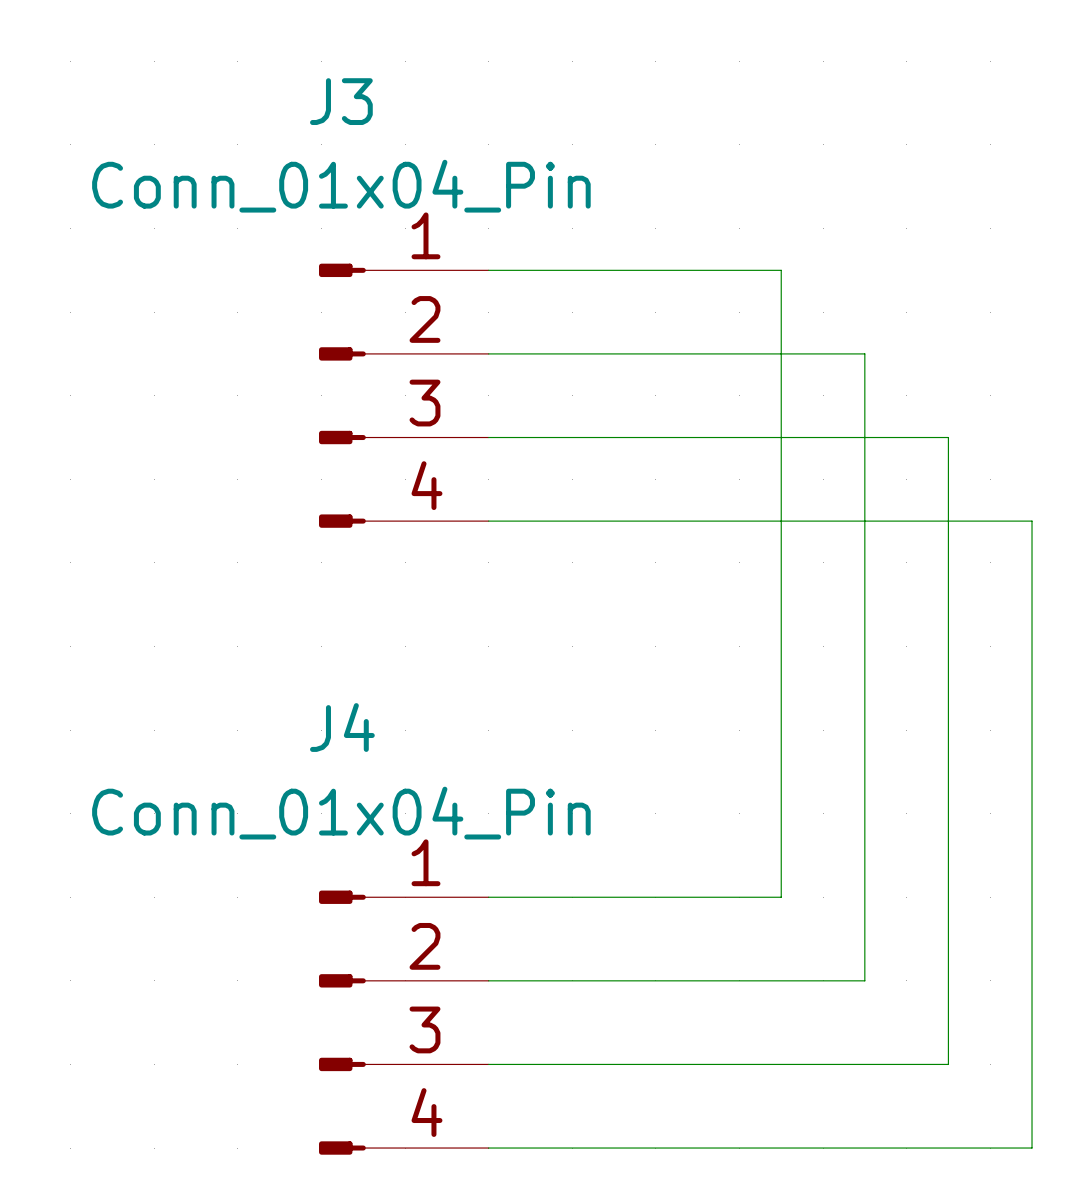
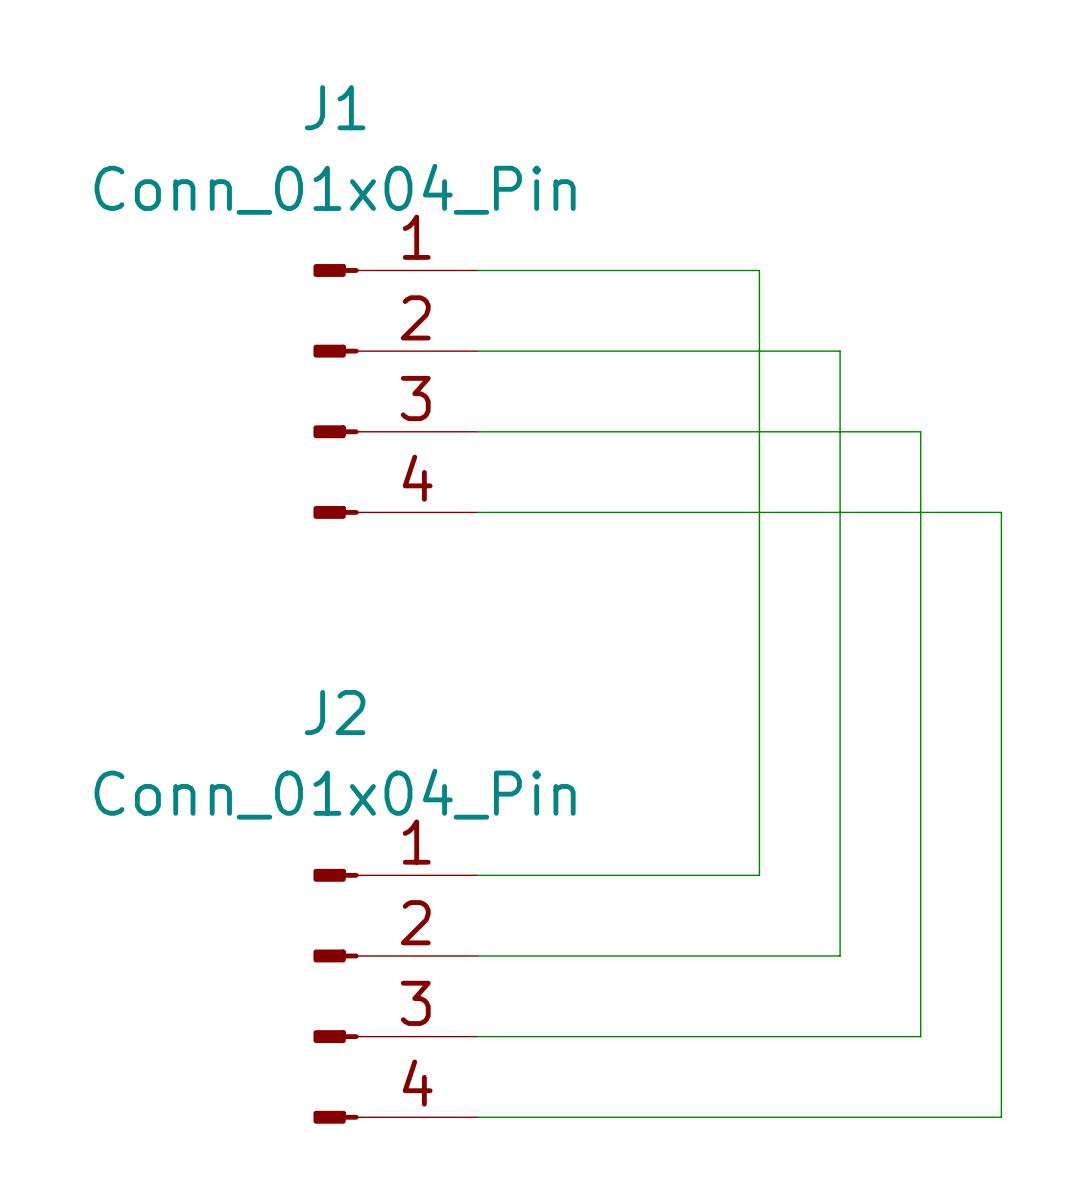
J3 name: J3 (341, 101) -> J1 (335, 107)
J4 name: J4 (342, 727) -> J2 (335, 712)

